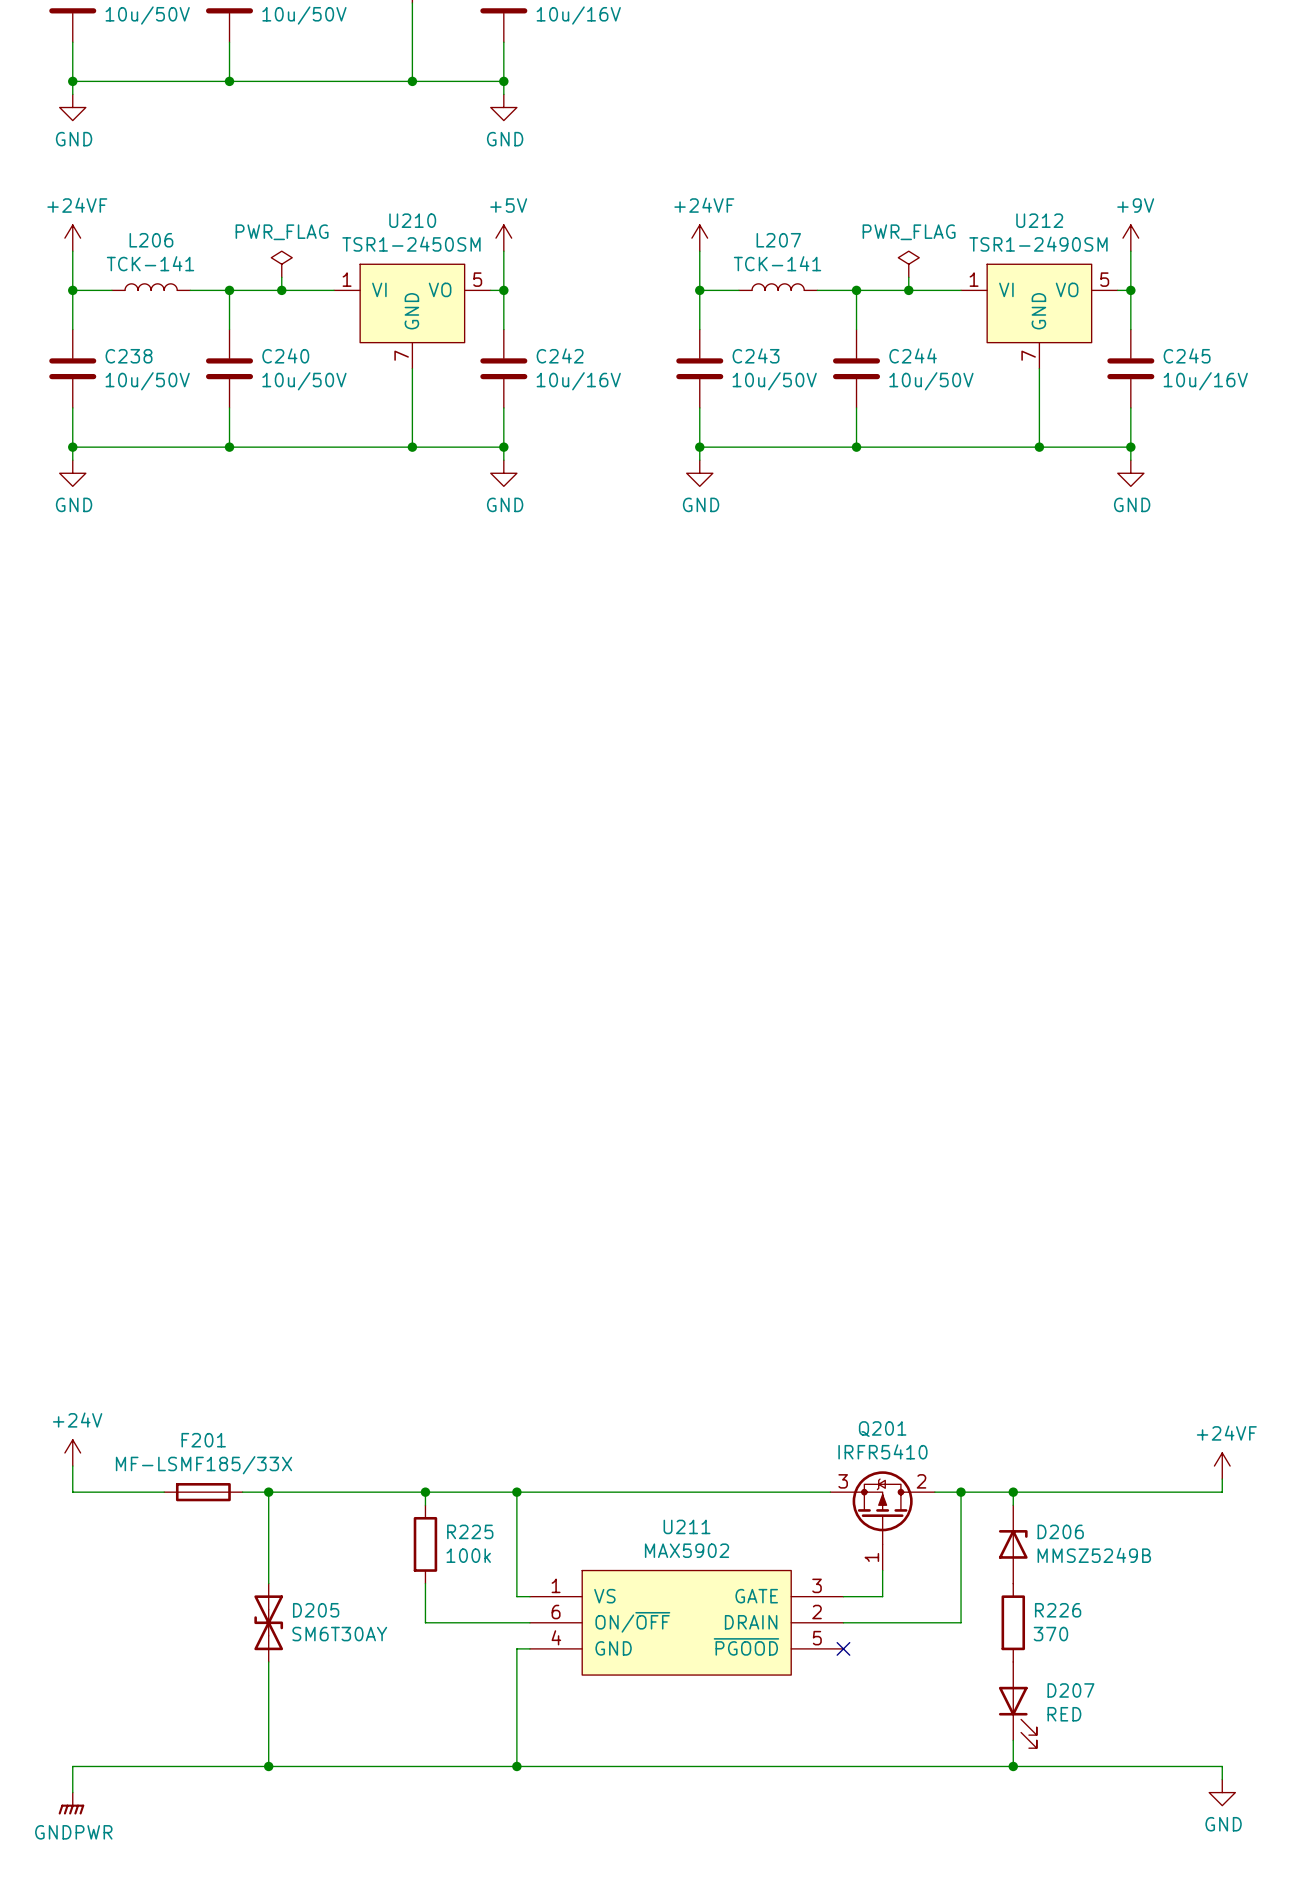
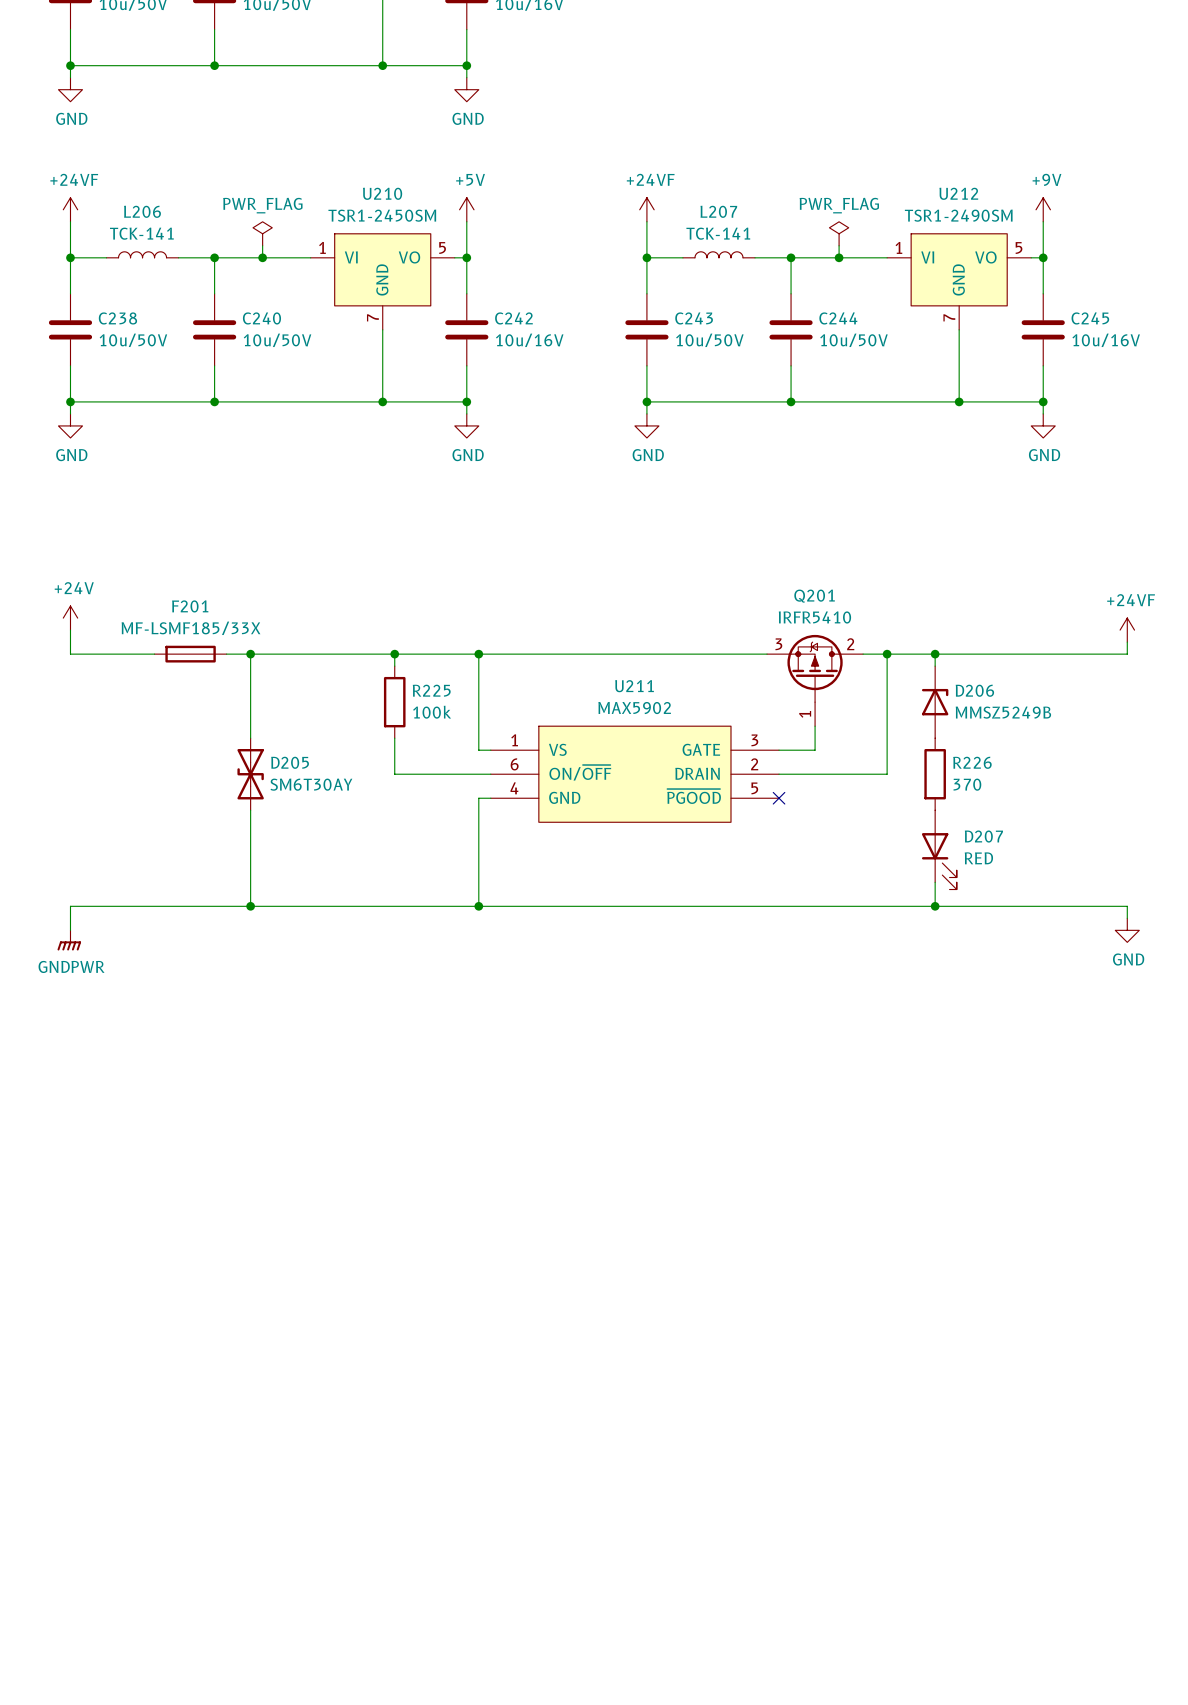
power symbol: none -> +24V (70, 618)
wire: none -> (70, 630) (70, 654) (154, 654)
power symbol: none -> +24VF (1127, 630)
wire: none -> (1127, 642) (1127, 654) (863, 654)
wire: none -> (226, 654) (767, 654)
wire: none -> (250, 654) (250, 738)
junction: none -> (250, 654)
wire: none -> (394, 654) (394, 666)
junction: none -> (394, 654)
wire: none -> (478, 654) (478, 750) (490, 750)
junction: none -> (478, 654)
wire: none -> (887, 654) (887, 774) (779, 774)
junction: none -> (887, 654)
wire: none -> (935, 654) (935, 666)
junction: none -> (935, 654)
wire: none -> (815, 726) (815, 750) (779, 750)
wire: none -> (394, 738) (394, 774) (490, 774)
wire: none -> (490, 798) (478, 798) (478, 906)
no-connect mark: none -> (779, 798)
wire: none -> (250, 810) (250, 906)
wire: none -> (935, 882) (935, 906)
junction: none -> (250, 906)
junction: none -> (478, 906)
junction: none -> (935, 906)
wire: none -> (1127, 918) (1127, 906) (70, 906) (70, 930)
power symbol: none -> GND (1127, 930)
power symbol: none -> GNDPWR (69, 940)
power symbol: +24V (72, 1452) -> none
wire: (72, 1466) (72, 1492) (164, 1492) -> none
power symbol: +24VF (1222, 1466) -> none
wire: (1222, 1479) (1222, 1492) (934, 1492) -> none
F201 position: (203, 1492) -> (190, 654)
wire: (242, 1492) (830, 1492) -> none
wire: (268, 1492) (268, 1583) -> none
junction: (268, 1492) -> none
wire: (425, 1492) (425, 1505) -> none
junction: (425, 1492) -> none
wire: (516, 1492) (516, 1596) (529, 1596) -> none
junction: (516, 1492) -> none
wire: (961, 1492) (961, 1622) (843, 1622) -> none
junction: (961, 1492) -> none
wire: (1013, 1492) (1013, 1505) -> none
junction: (1013, 1492) -> none
Q201 position: (882, 1520) -> (815, 680)
R225 position: (425, 1544) -> (394, 702)
D206 position: (1013, 1544) -> (935, 702)
wire: (882, 1570) (882, 1596) (843, 1596) -> none
wire: (425, 1583) (425, 1622) (529, 1622) -> none
D205 position: (268, 1622) -> (250, 774)
U211 position: (686, 1622) -> (634, 774)
R226 position: (1013, 1622) -> (935, 774)
wire: (529, 1648) (516, 1648) (516, 1766) -> none
no-connect mark: (843, 1648) -> none
wire: (268, 1661) (268, 1766) -> none
D207 position: (1017, 1705) -> (939, 849)
wire: (1013, 1740) (1013, 1766) -> none
junction: (268, 1766) -> none
junction: (516, 1766) -> none
junction: (1013, 1766) -> none
wire: (1222, 1779) (1222, 1766) (72, 1766) (72, 1792) -> none
power symbol: GND (1222, 1792) -> none
power symbol: GNDPWR (71, 1803) -> none

